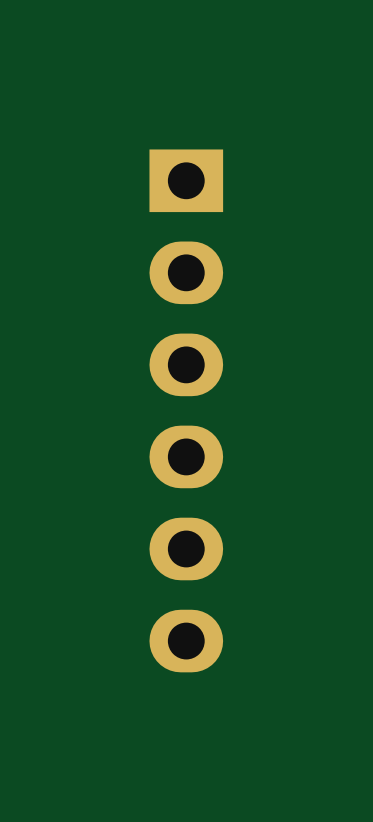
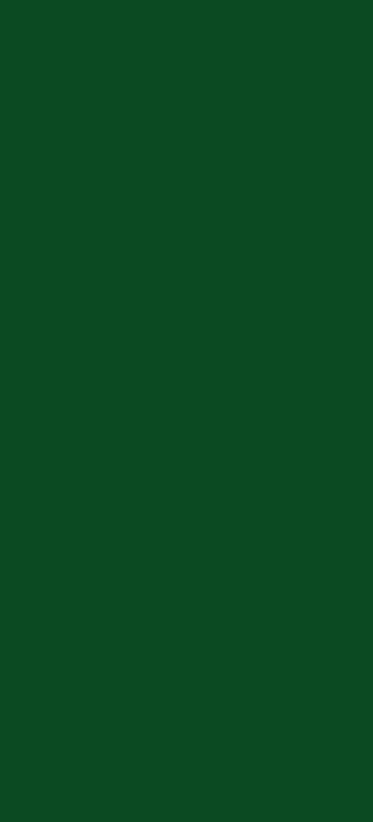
part: (186, 410) -> none

